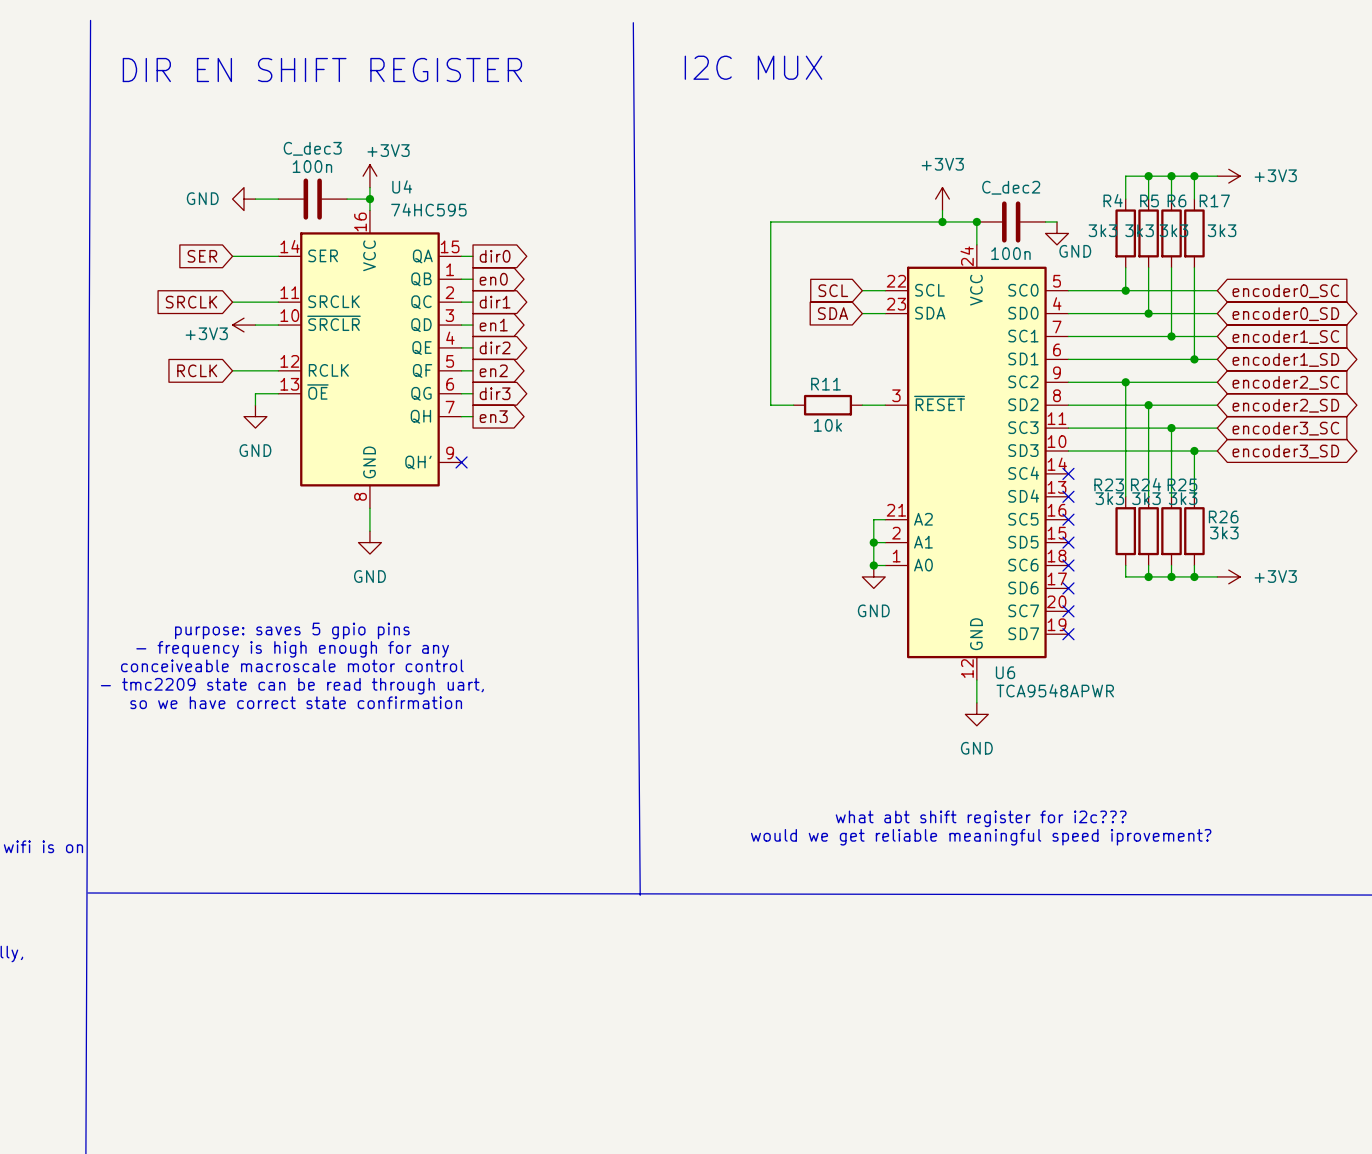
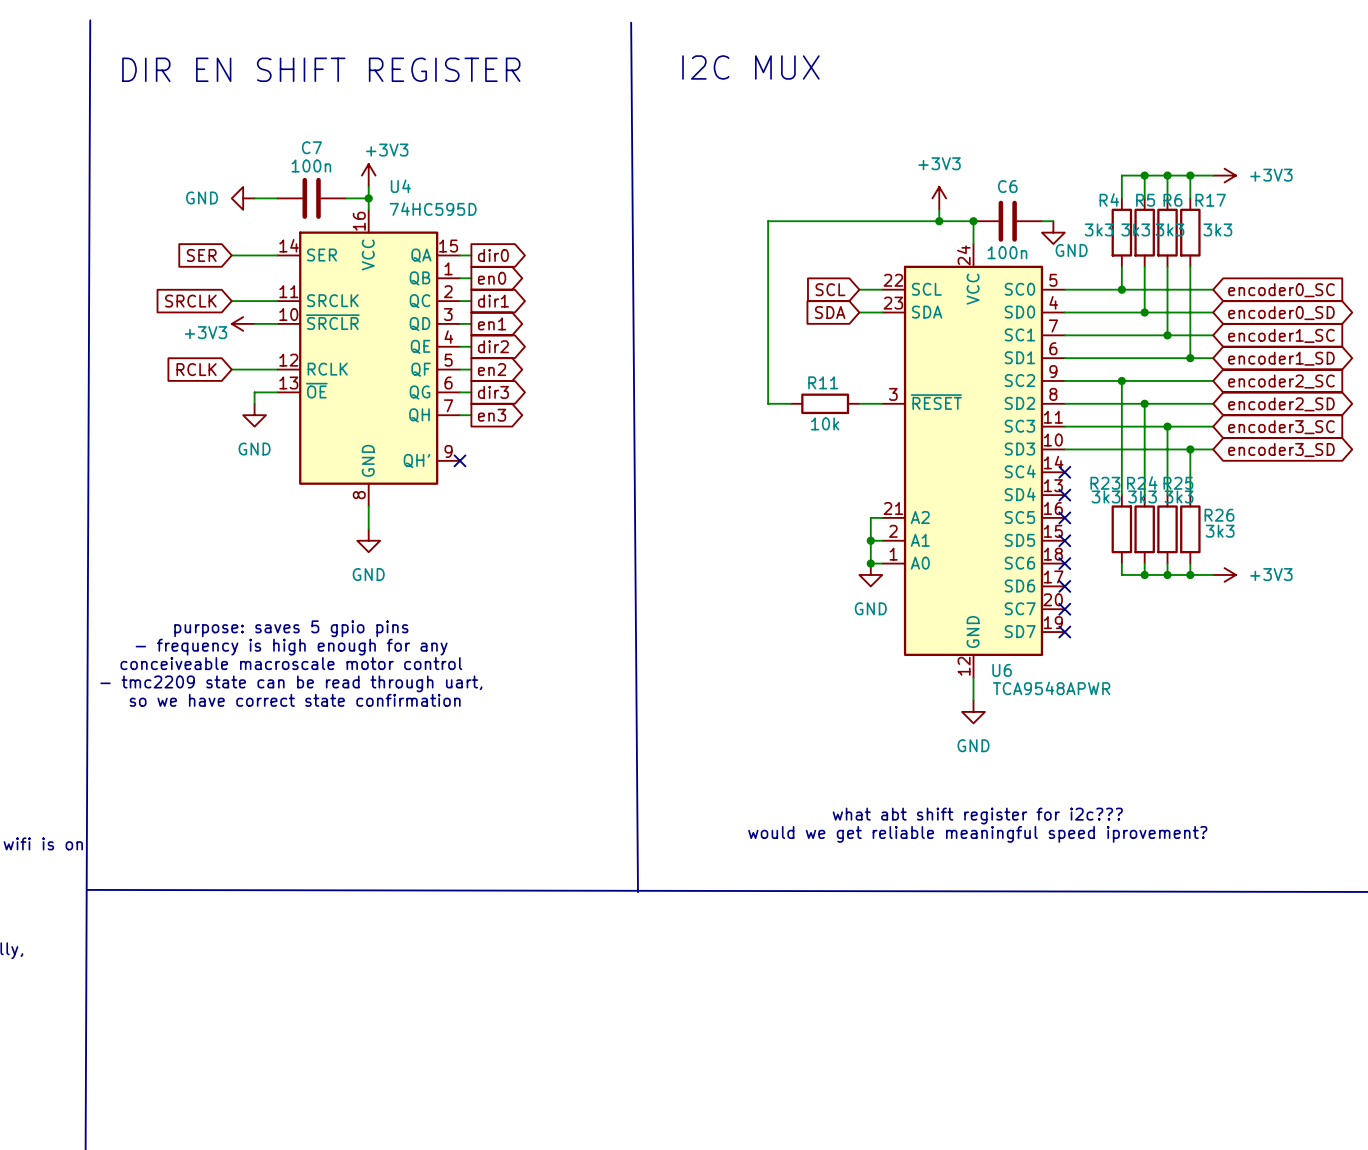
C_dec3 name: C_dec3 (312, 148) -> C7 (311, 147)
C_dec2 name: C_dec2 (1011, 187) -> C6 (1007, 186)
U4 value: 74HC595 (428, 209) -> 74HC595D (433, 209)

